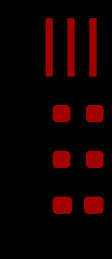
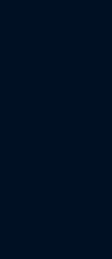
part: (71, 47) -> none
part: (78, 113) -> none
part: (78, 159) -> none
part: (78, 205) -> none

